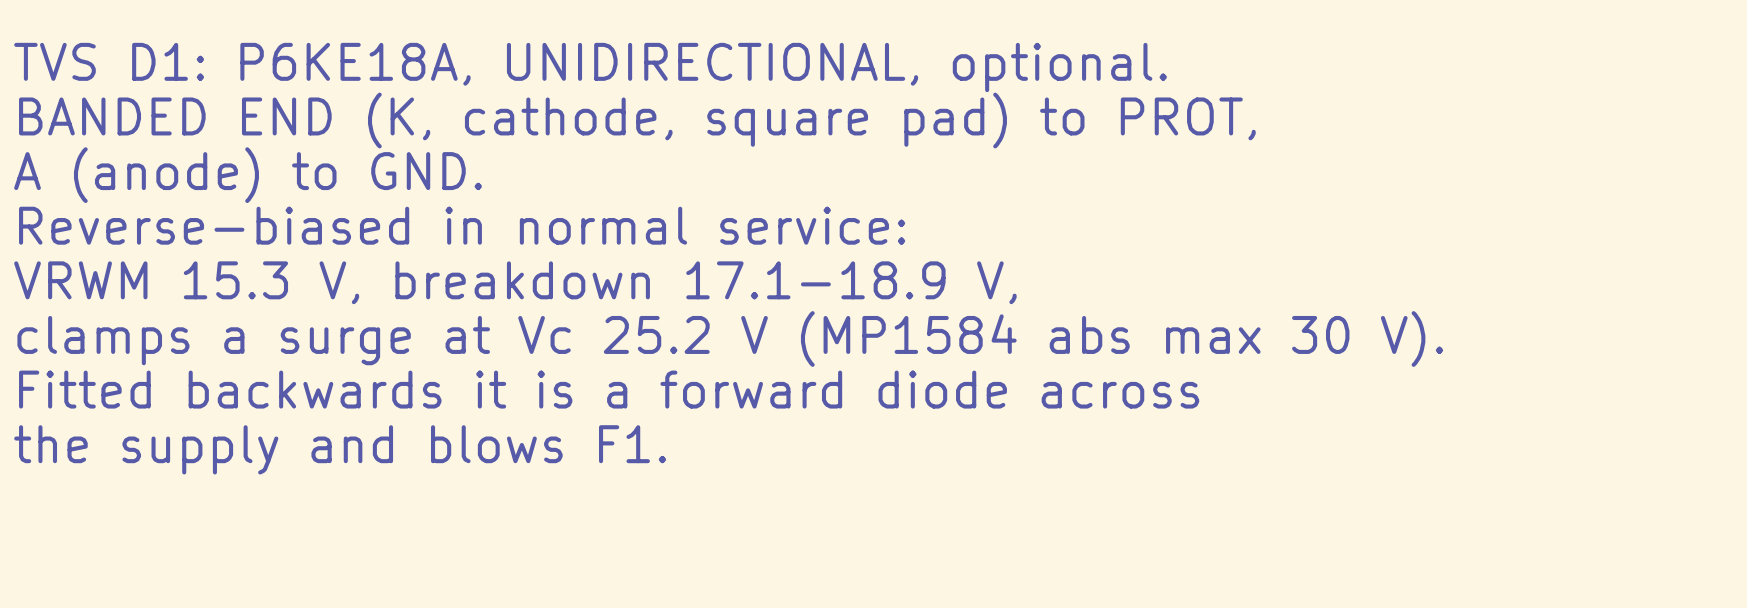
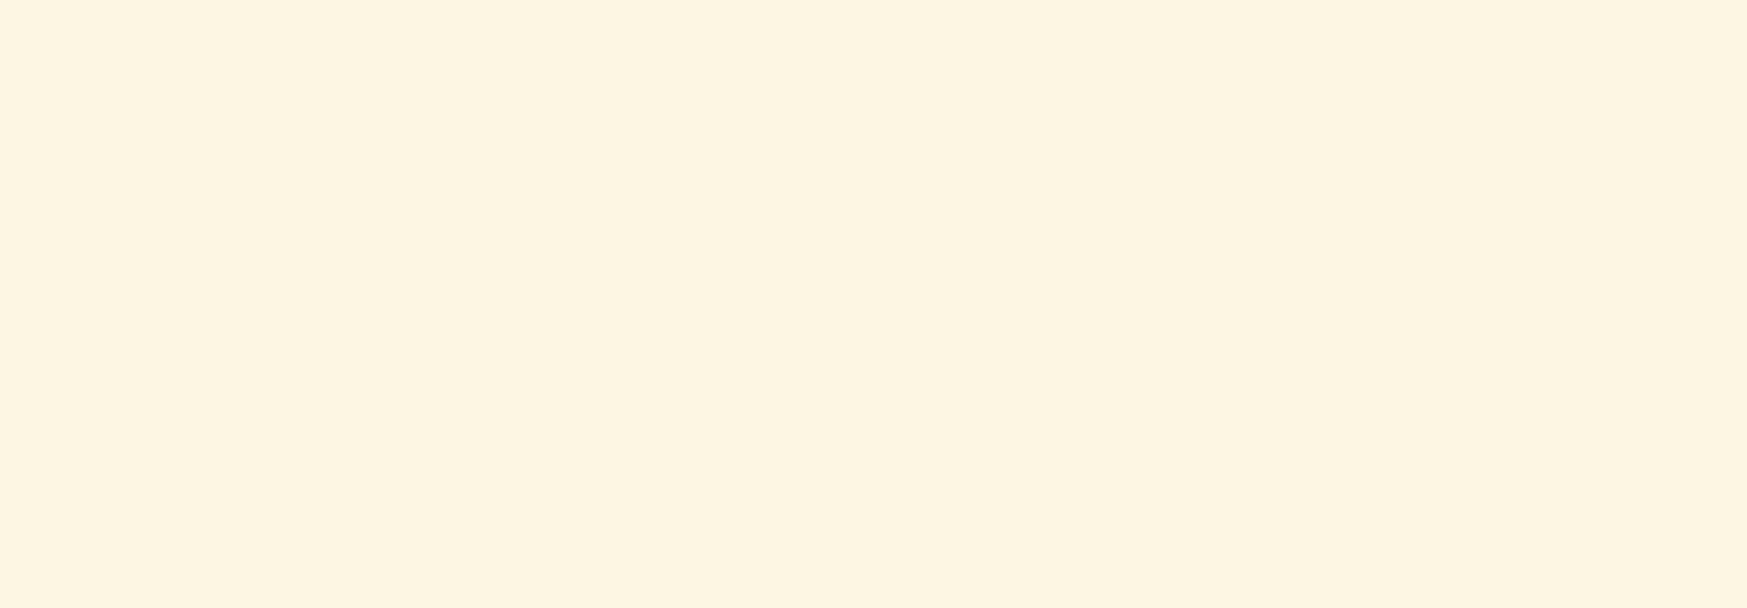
text: TVS D1: P6KE18A, UNIDIRECTIONAL, optional. (590, 67) -> none
text: BANDED END (K, cathode, square pad) to PROT, (637, 120) -> none
text: A (anode) to GND. (248, 175) -> none
text: Reverse-biased in normal service: (462, 225) -> none
text: VRWM 15.3 V, breakdown 17.1-18.9 V, (515, 282) -> none
text: clamps a surge at Vc 25.2 V (MP1584 abs max 30 V). (730, 338) -> none
text: Fitted backwards it is a forward diode across (609, 389) -> none
text: the supply and blows F1. (340, 449) -> none

